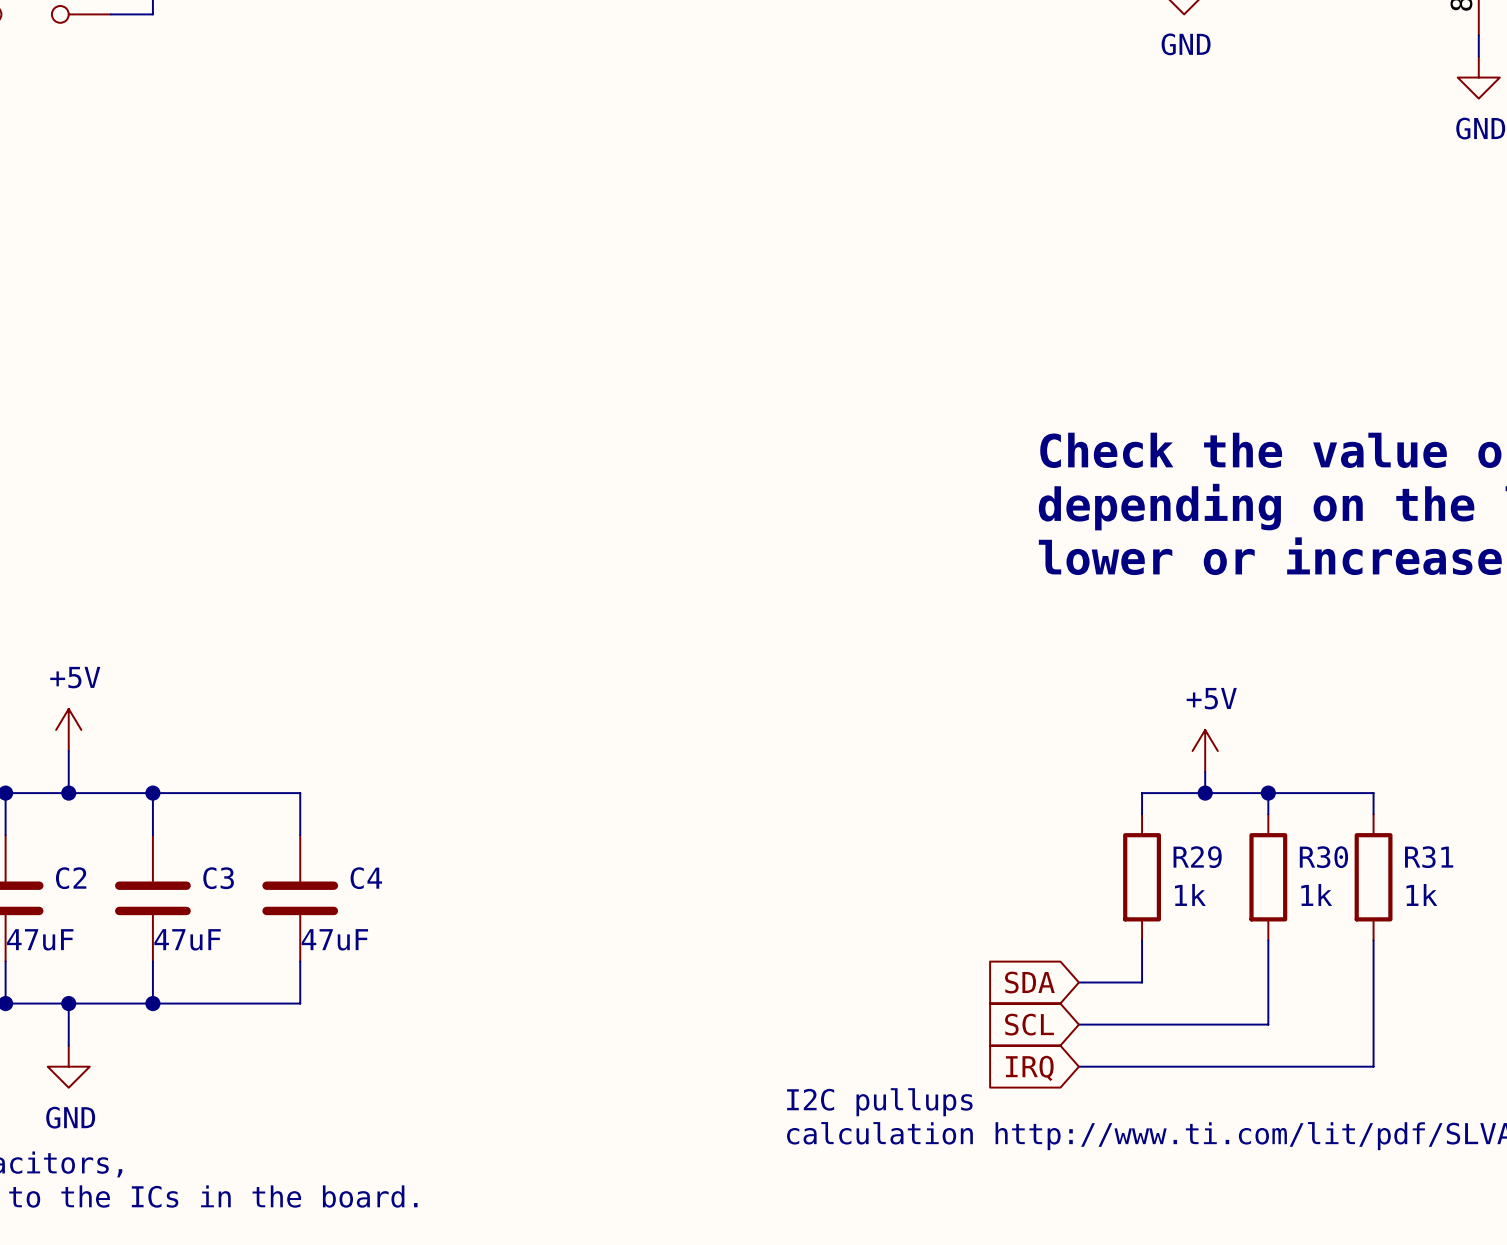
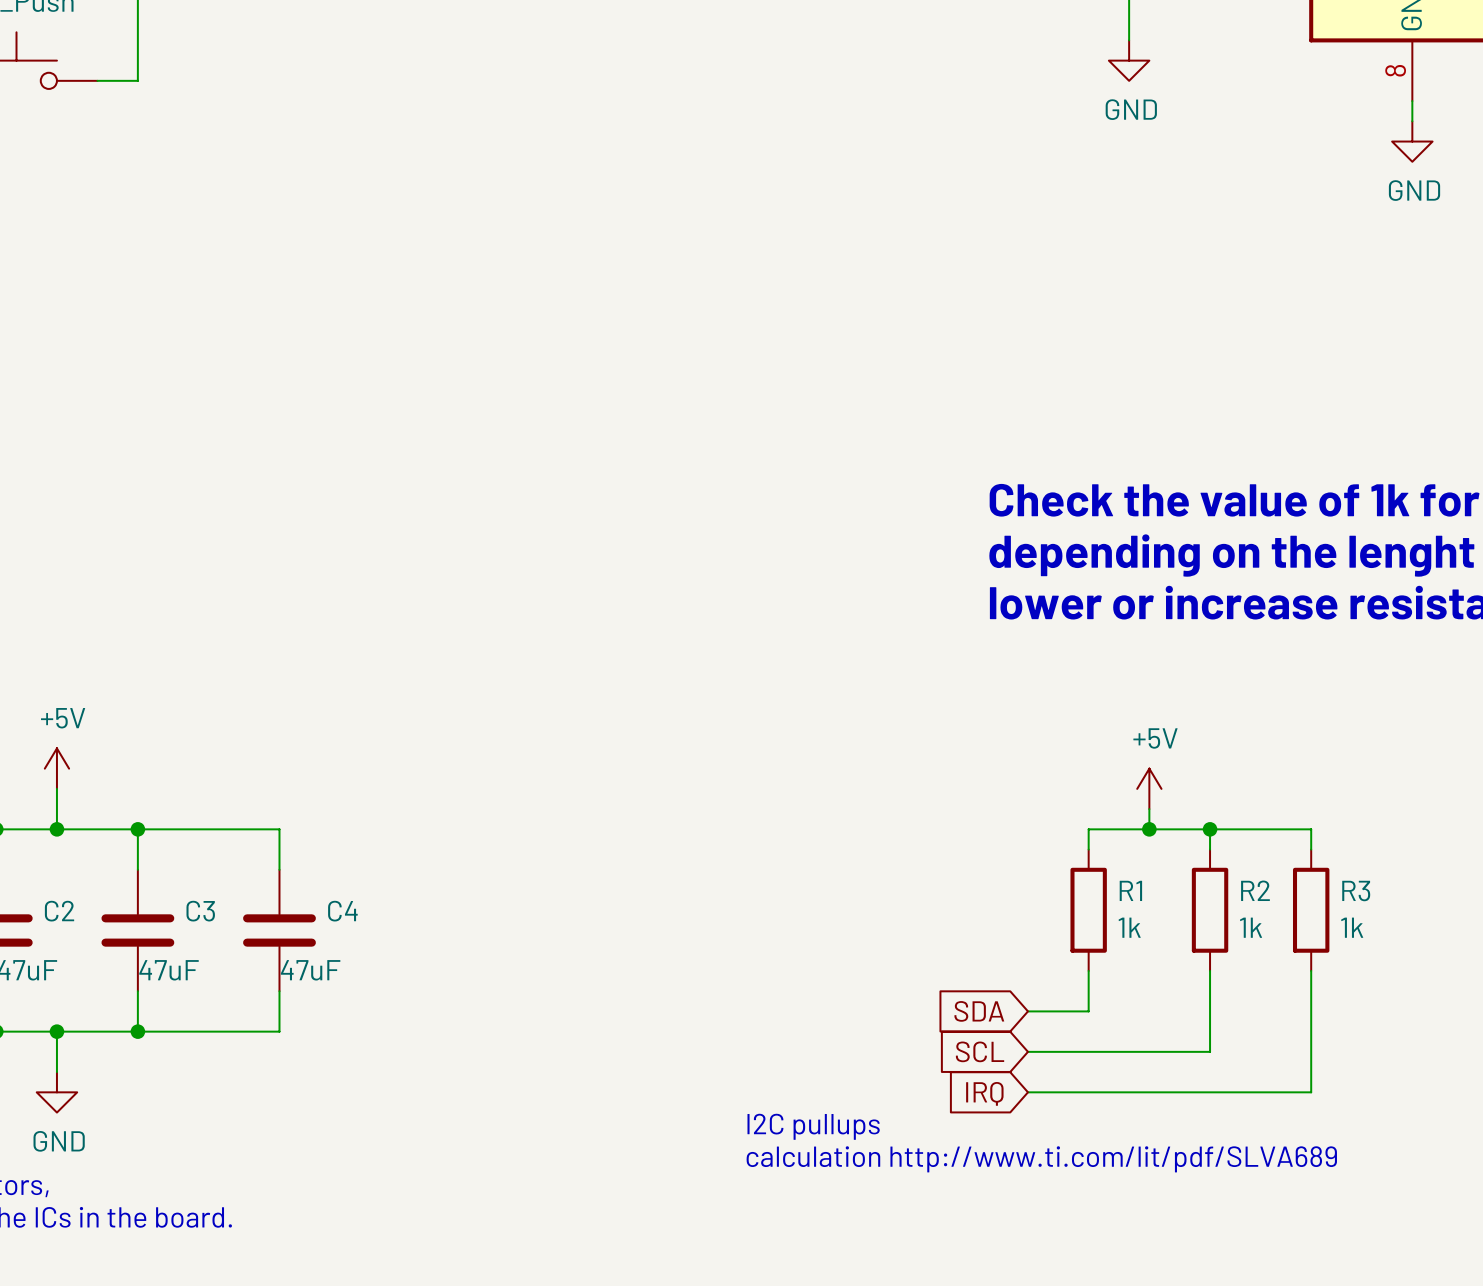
R29 name: R29 (1197, 857) -> R1 (1130, 890)
R30 name: R30 (1323, 857) -> R2 (1255, 890)
R31 name: R31 (1429, 857) -> R3 (1356, 891)

